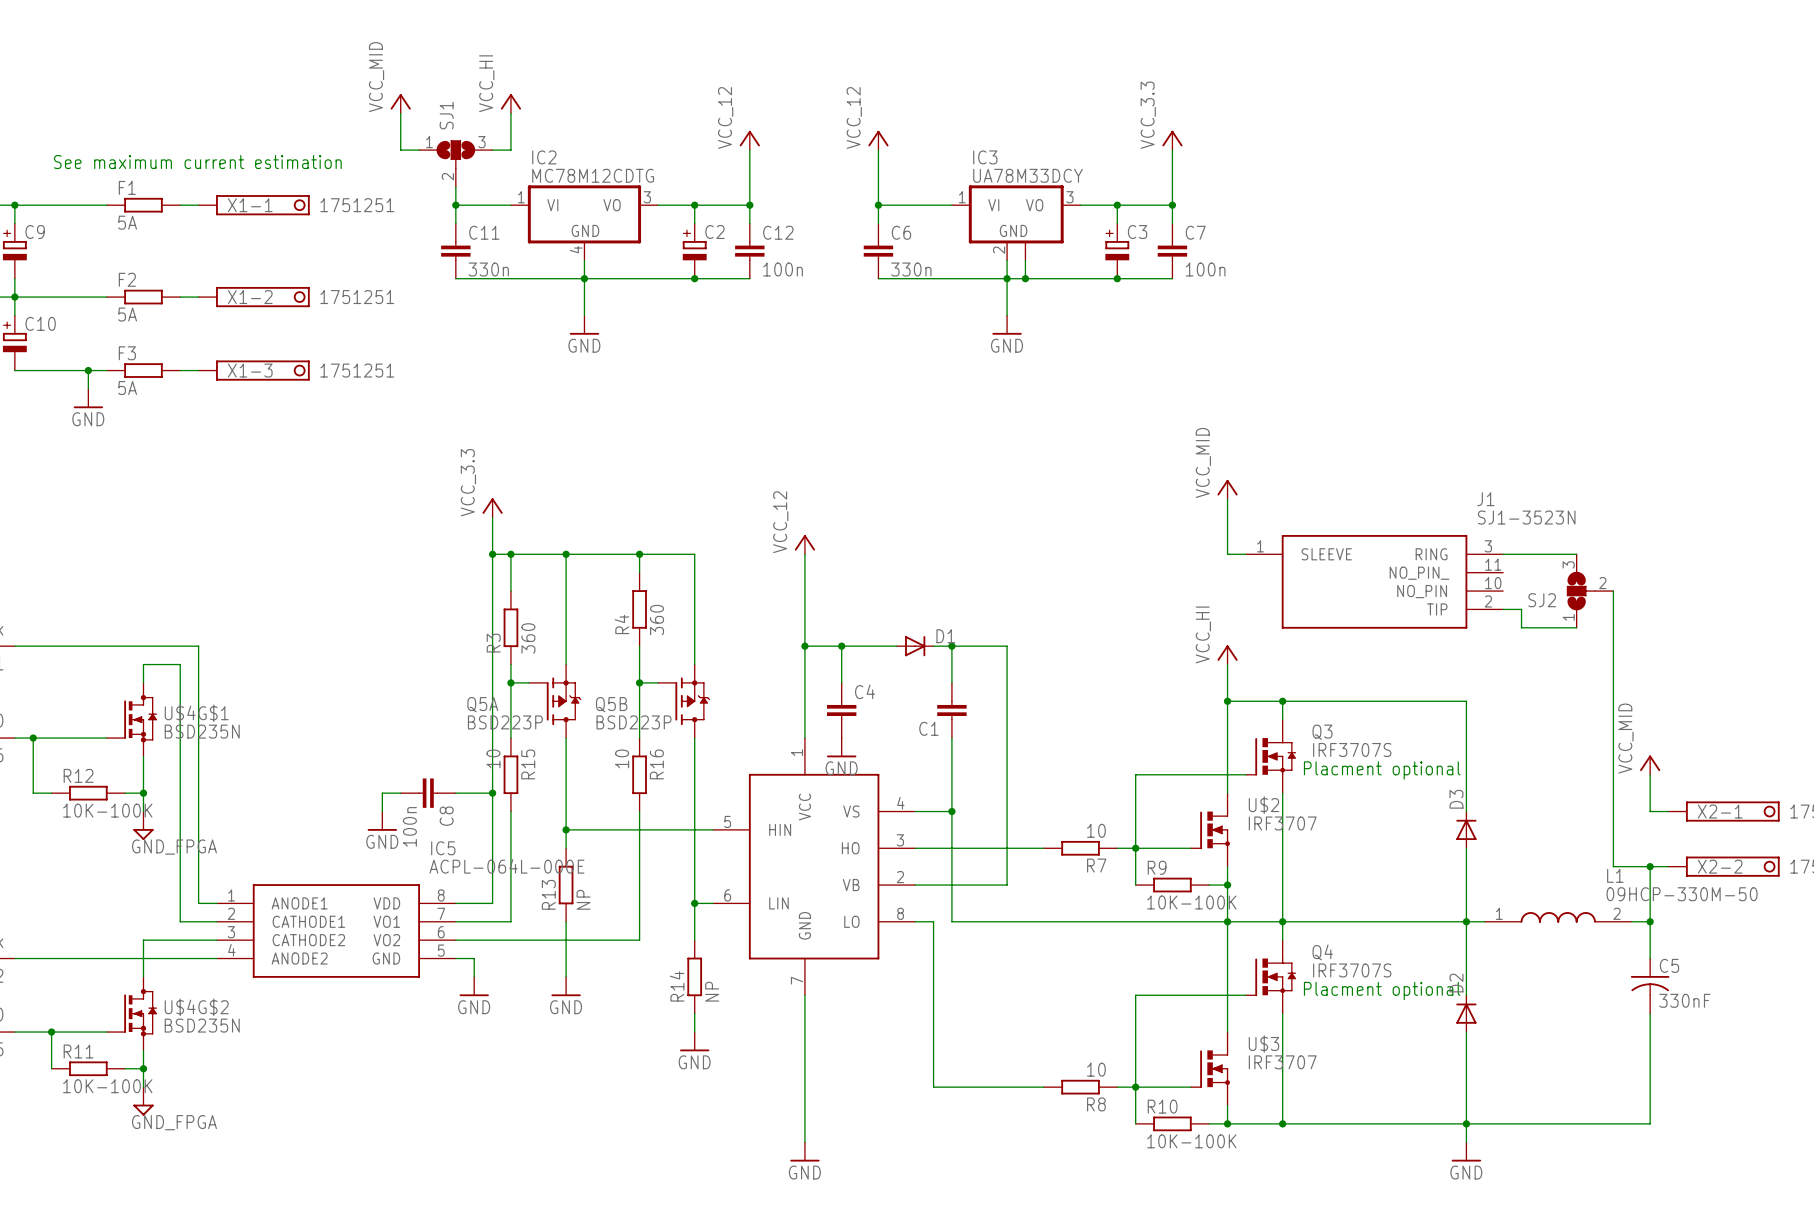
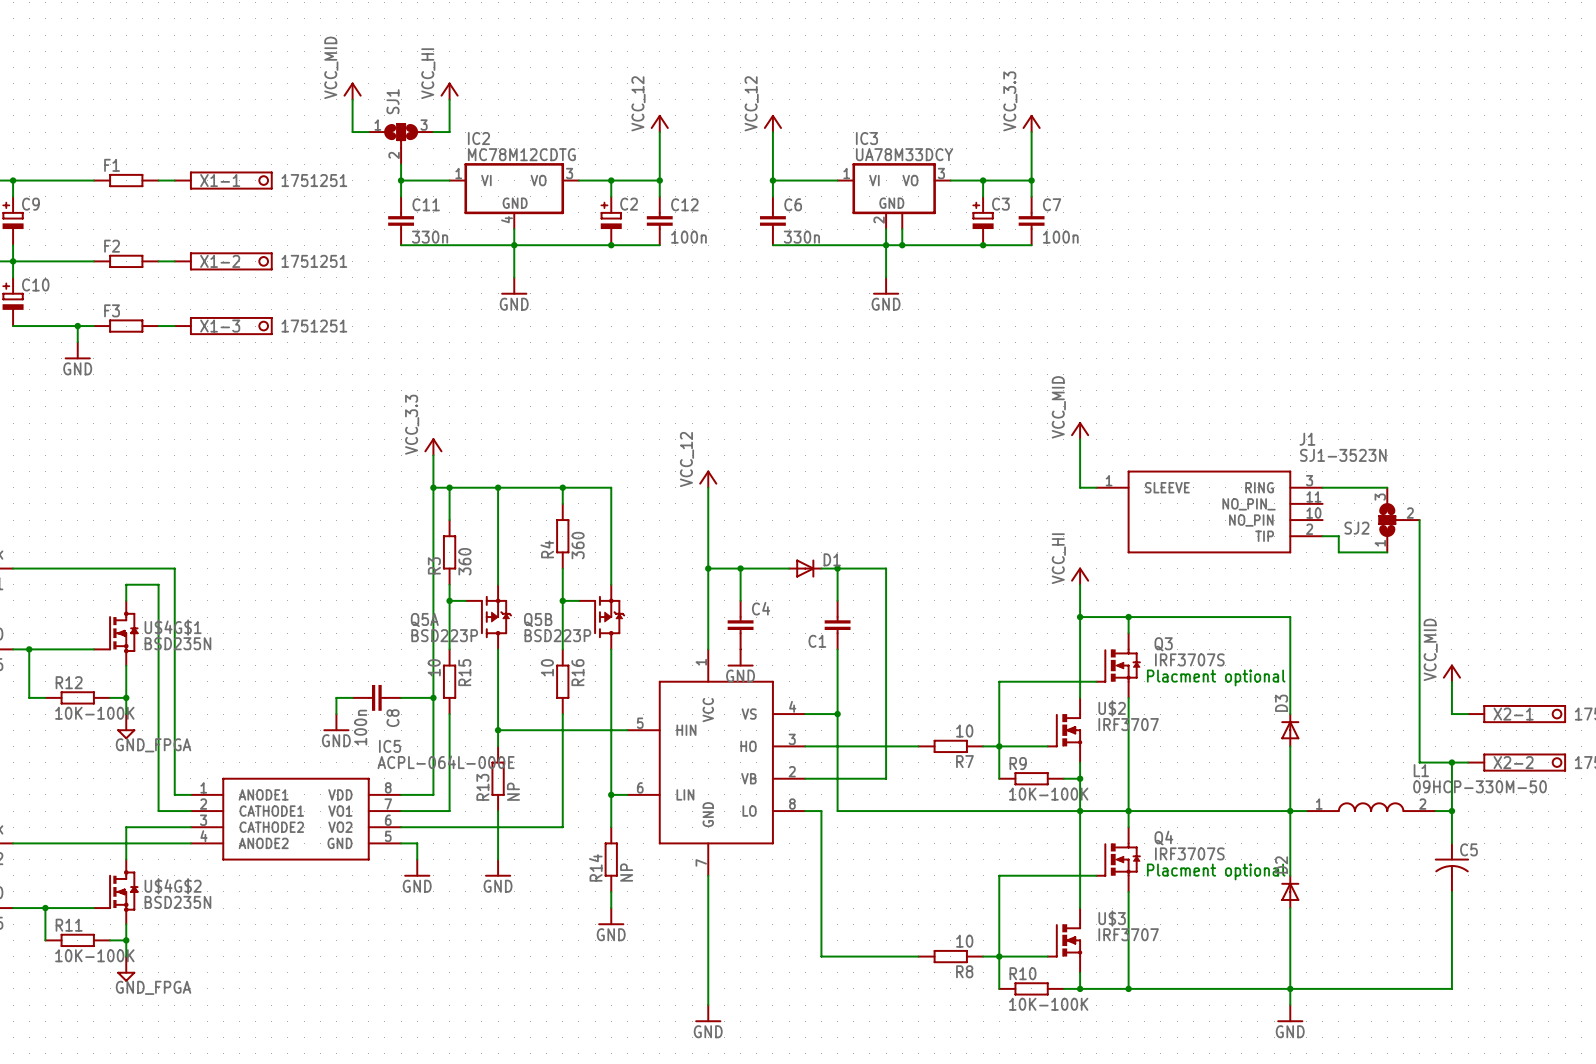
text: See maximum current estimation (197, 162) -> none
F1 value: 5A (127, 222) -> none
F2 value: 5A (127, 314) -> none
F3 value: 5A (127, 388) -> none
C5 value: 330nF (1684, 1000) -> none

